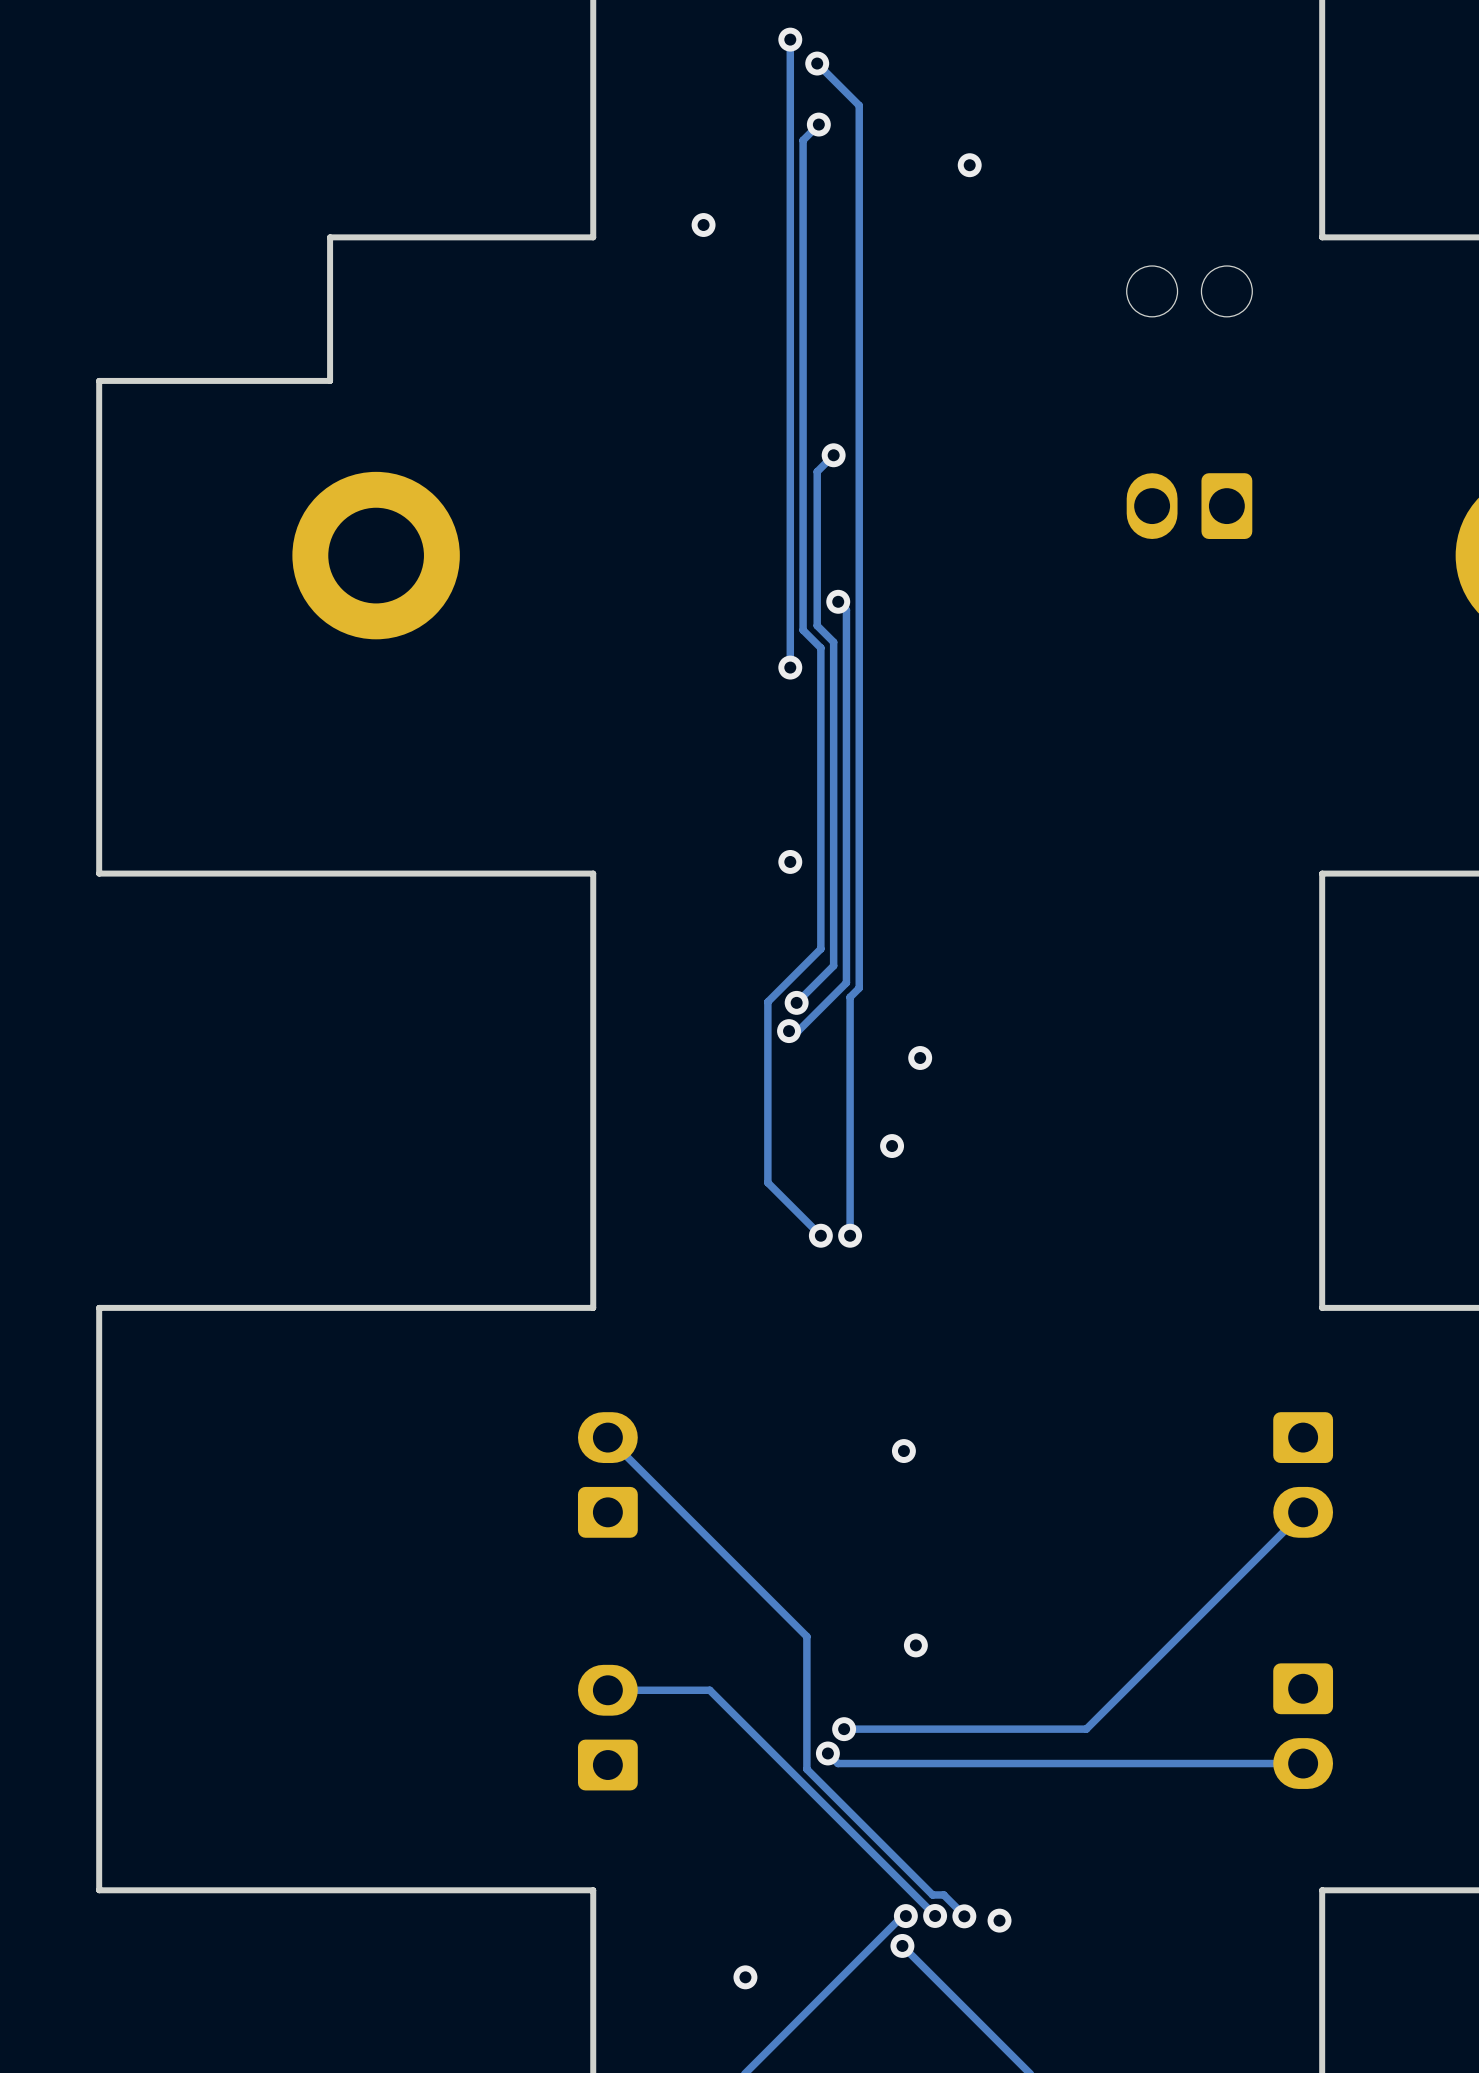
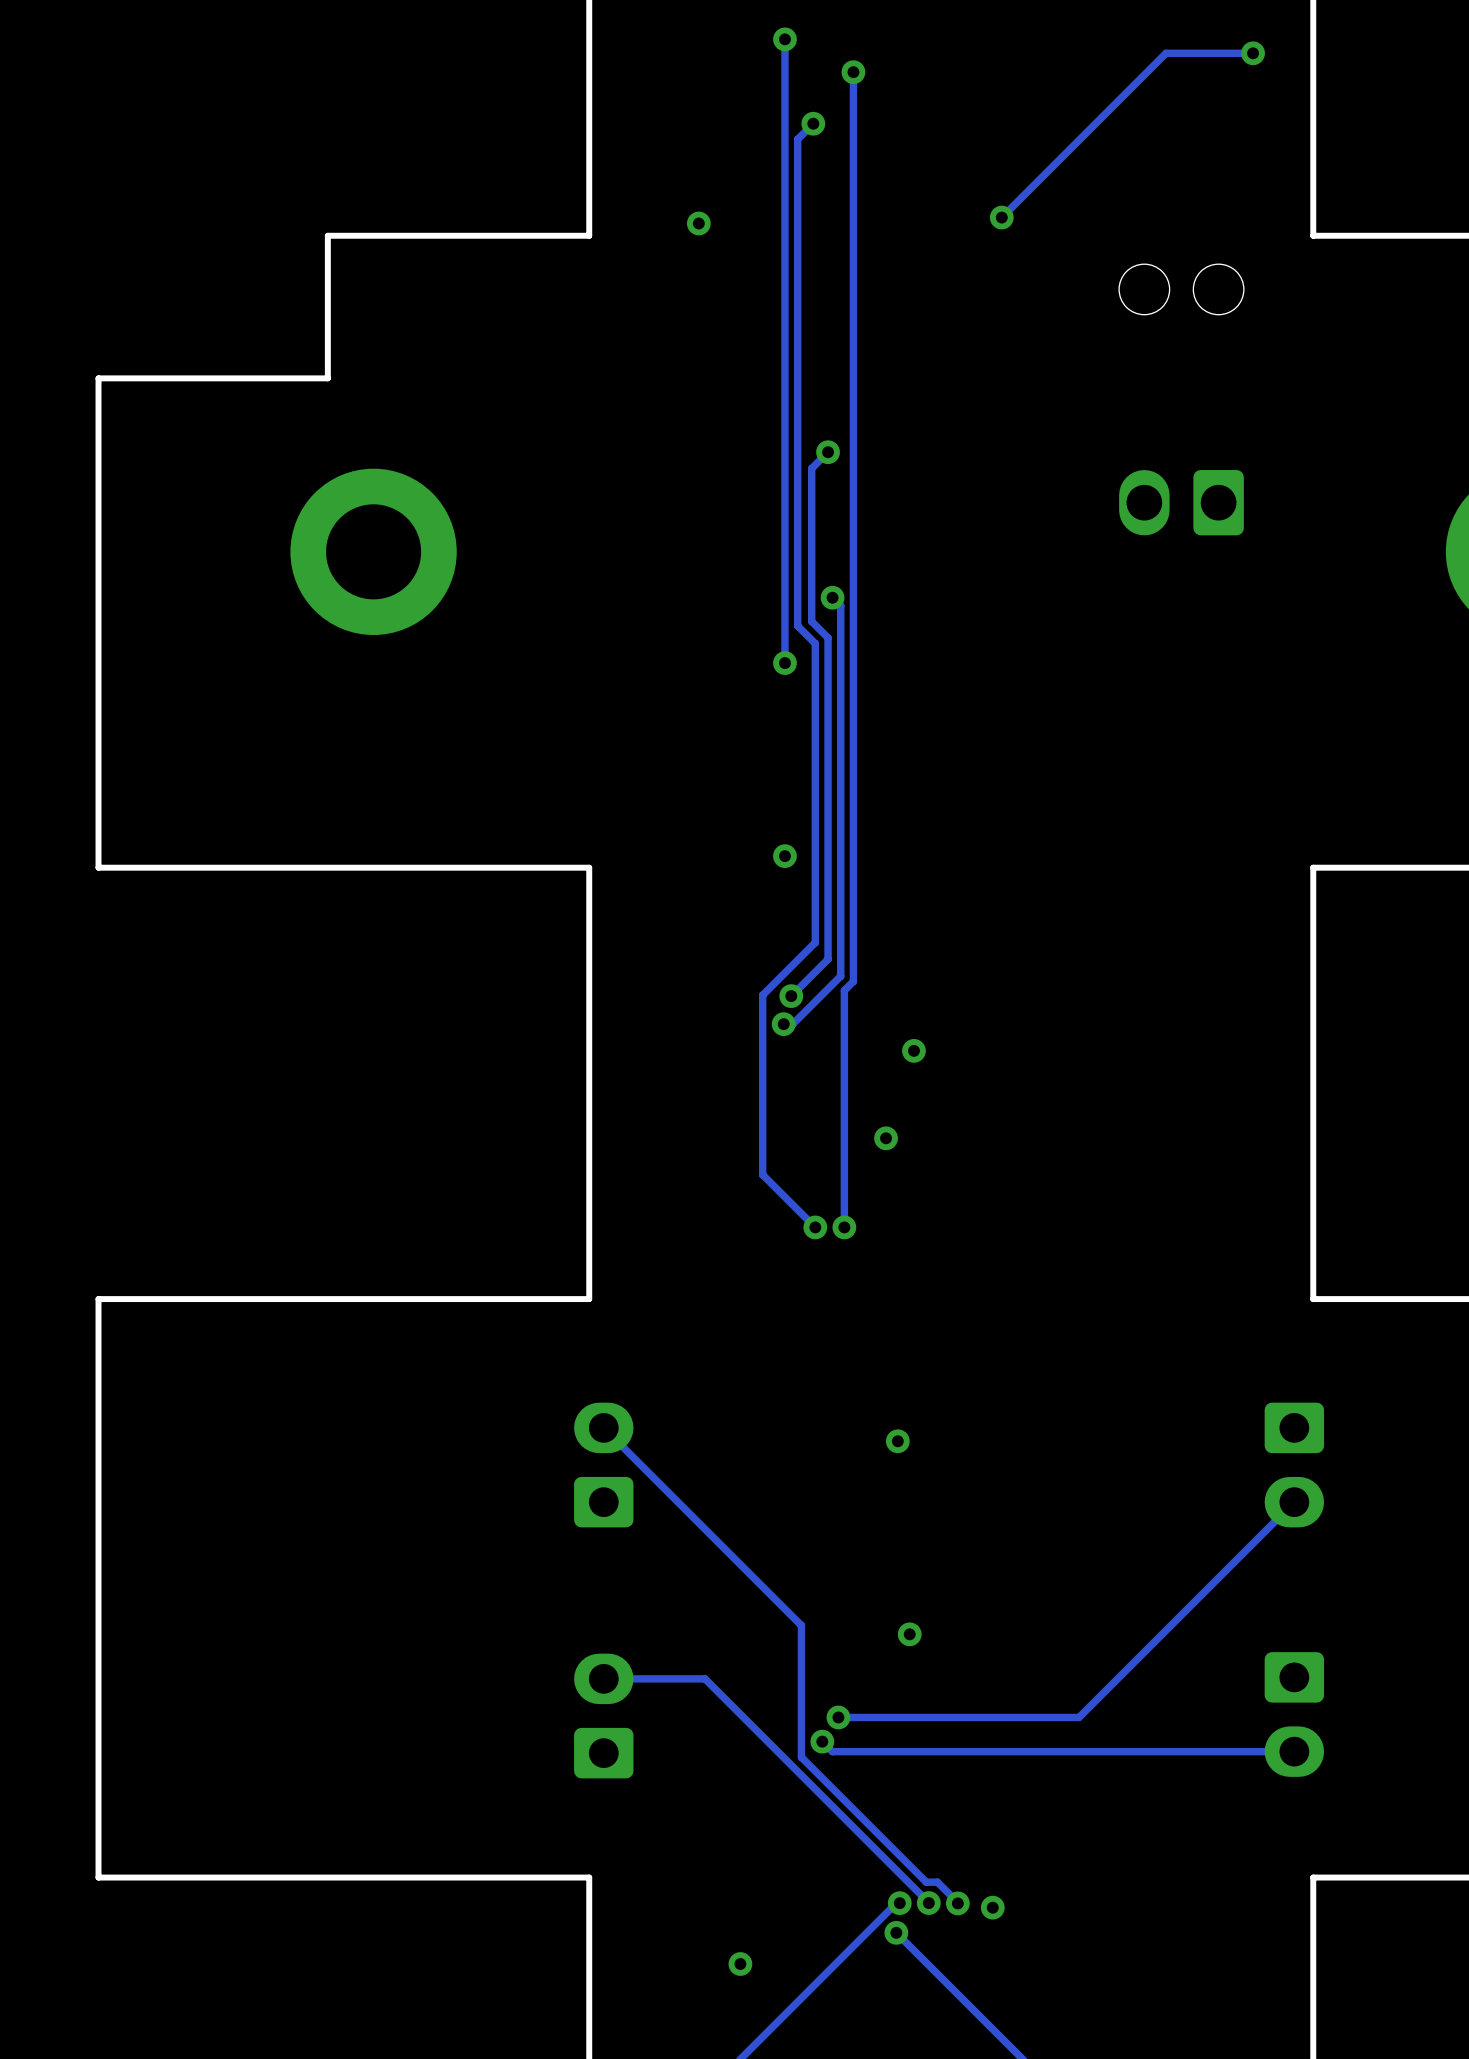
track: none -> (1253, 53) (1166, 53) (1001, 217)
via: none -> (1253, 53)
track: (817, 63) (859, 105) -> (853, 72) (853, 104)
via position: (817, 63) -> (853, 72)
via position: (969, 165) -> (1001, 217)

